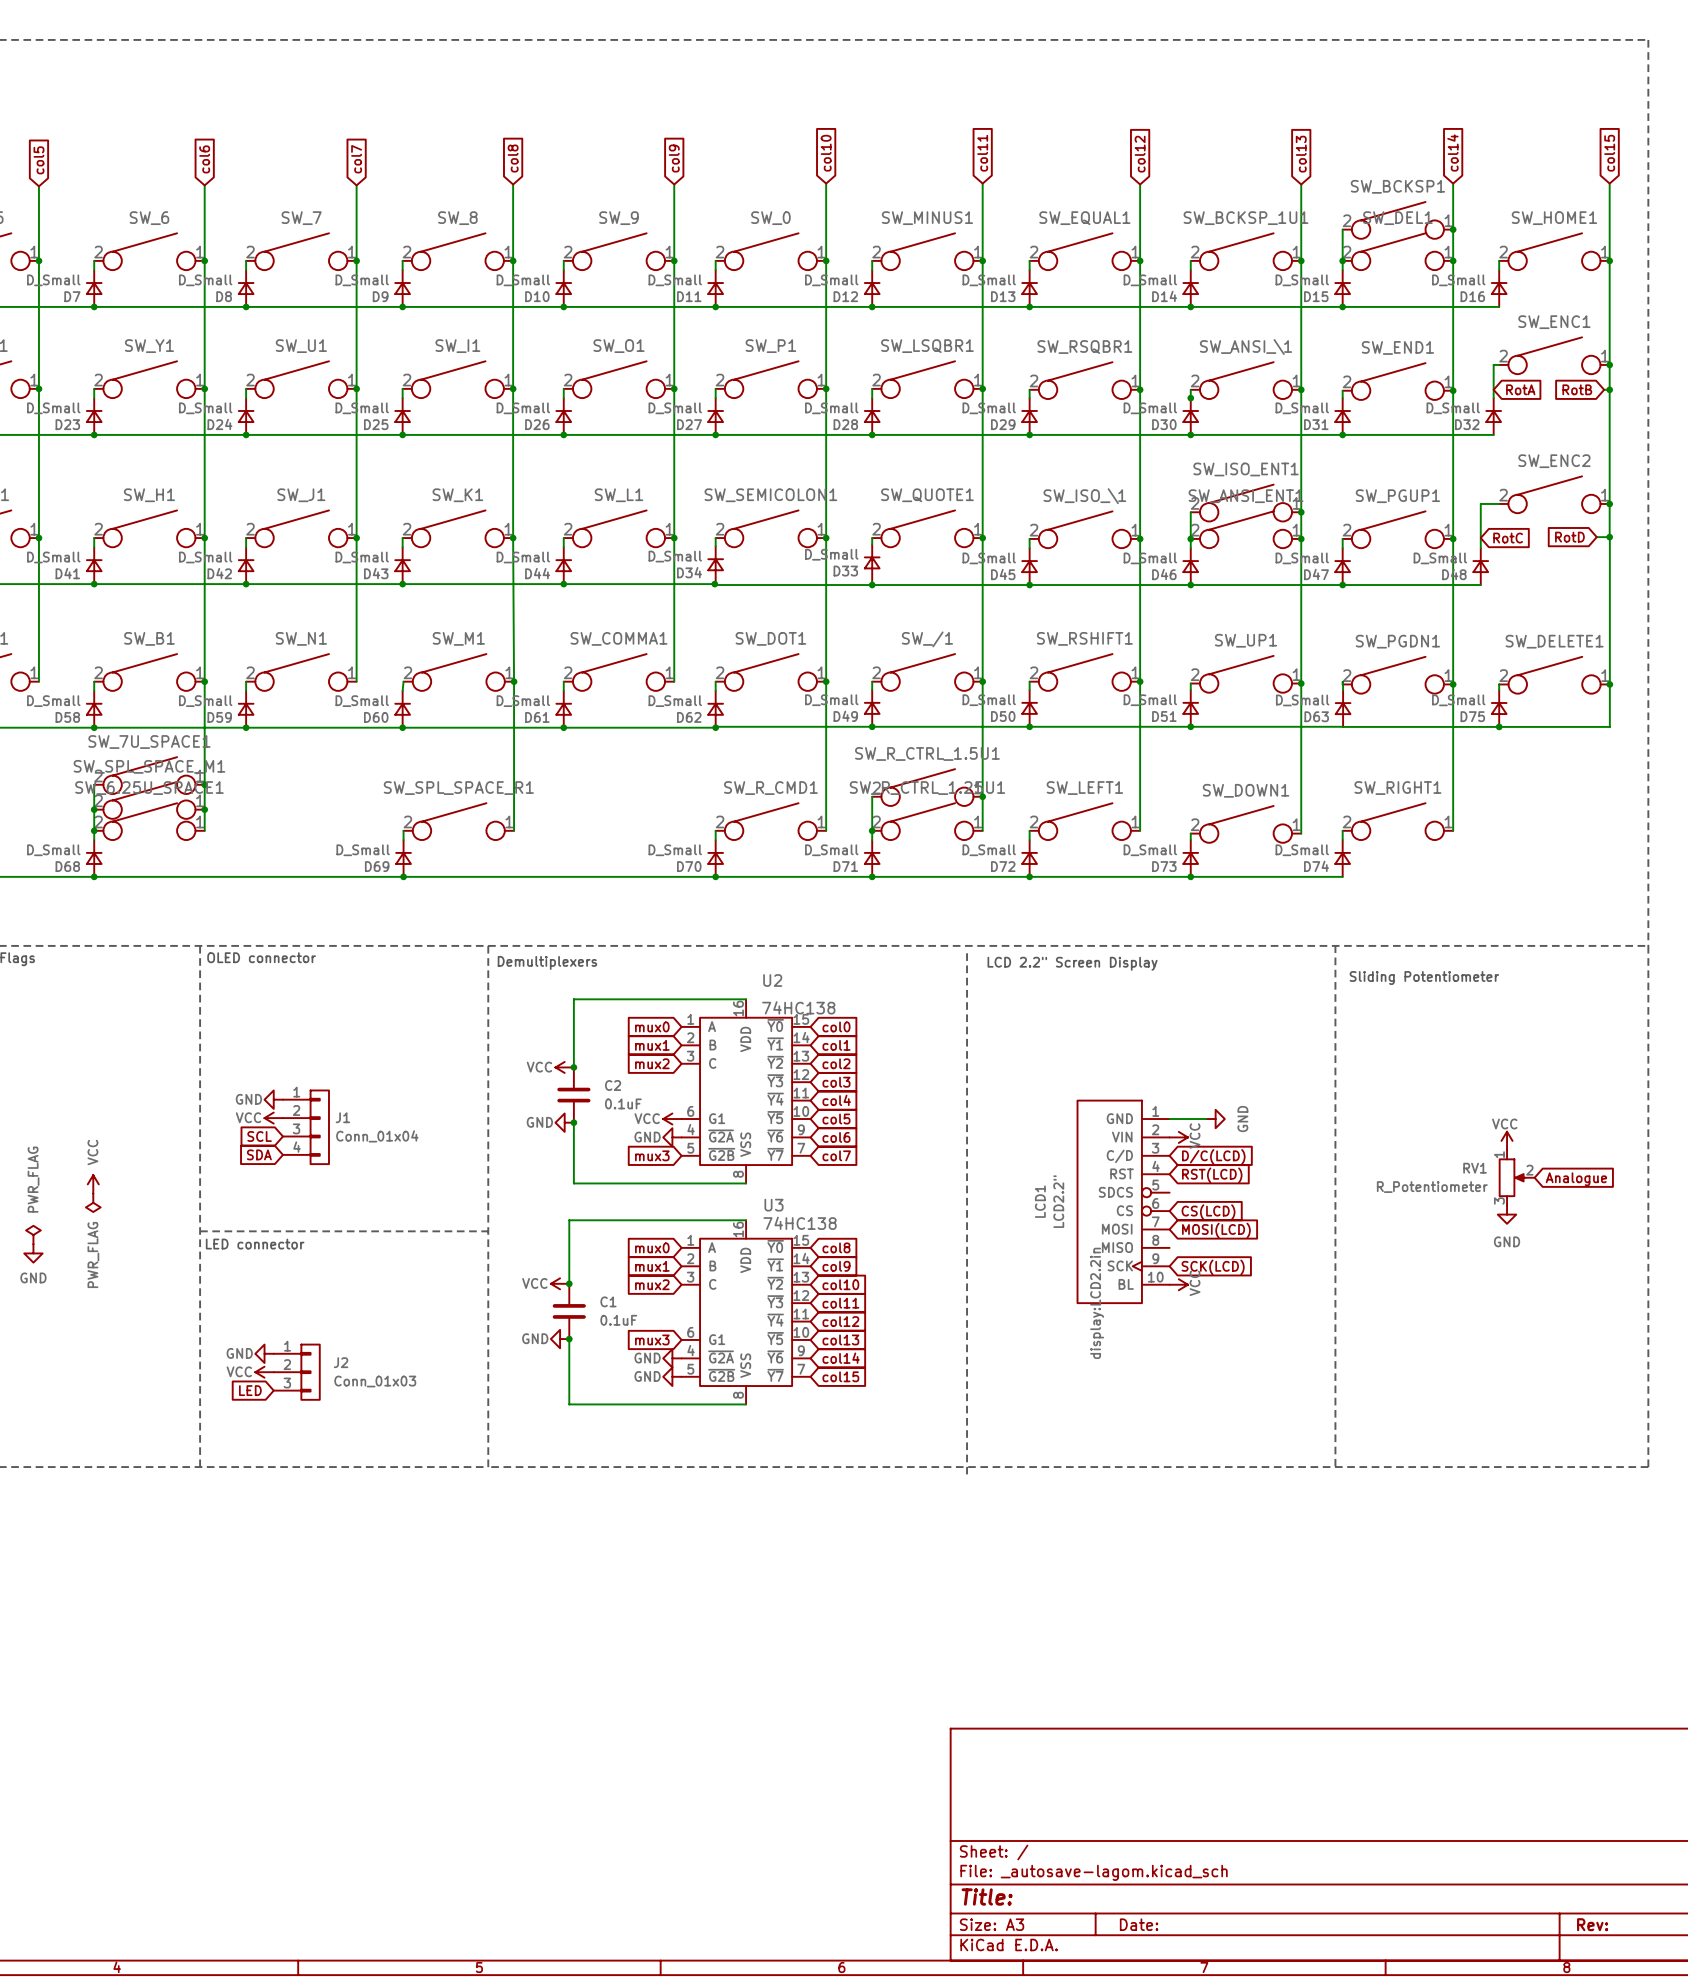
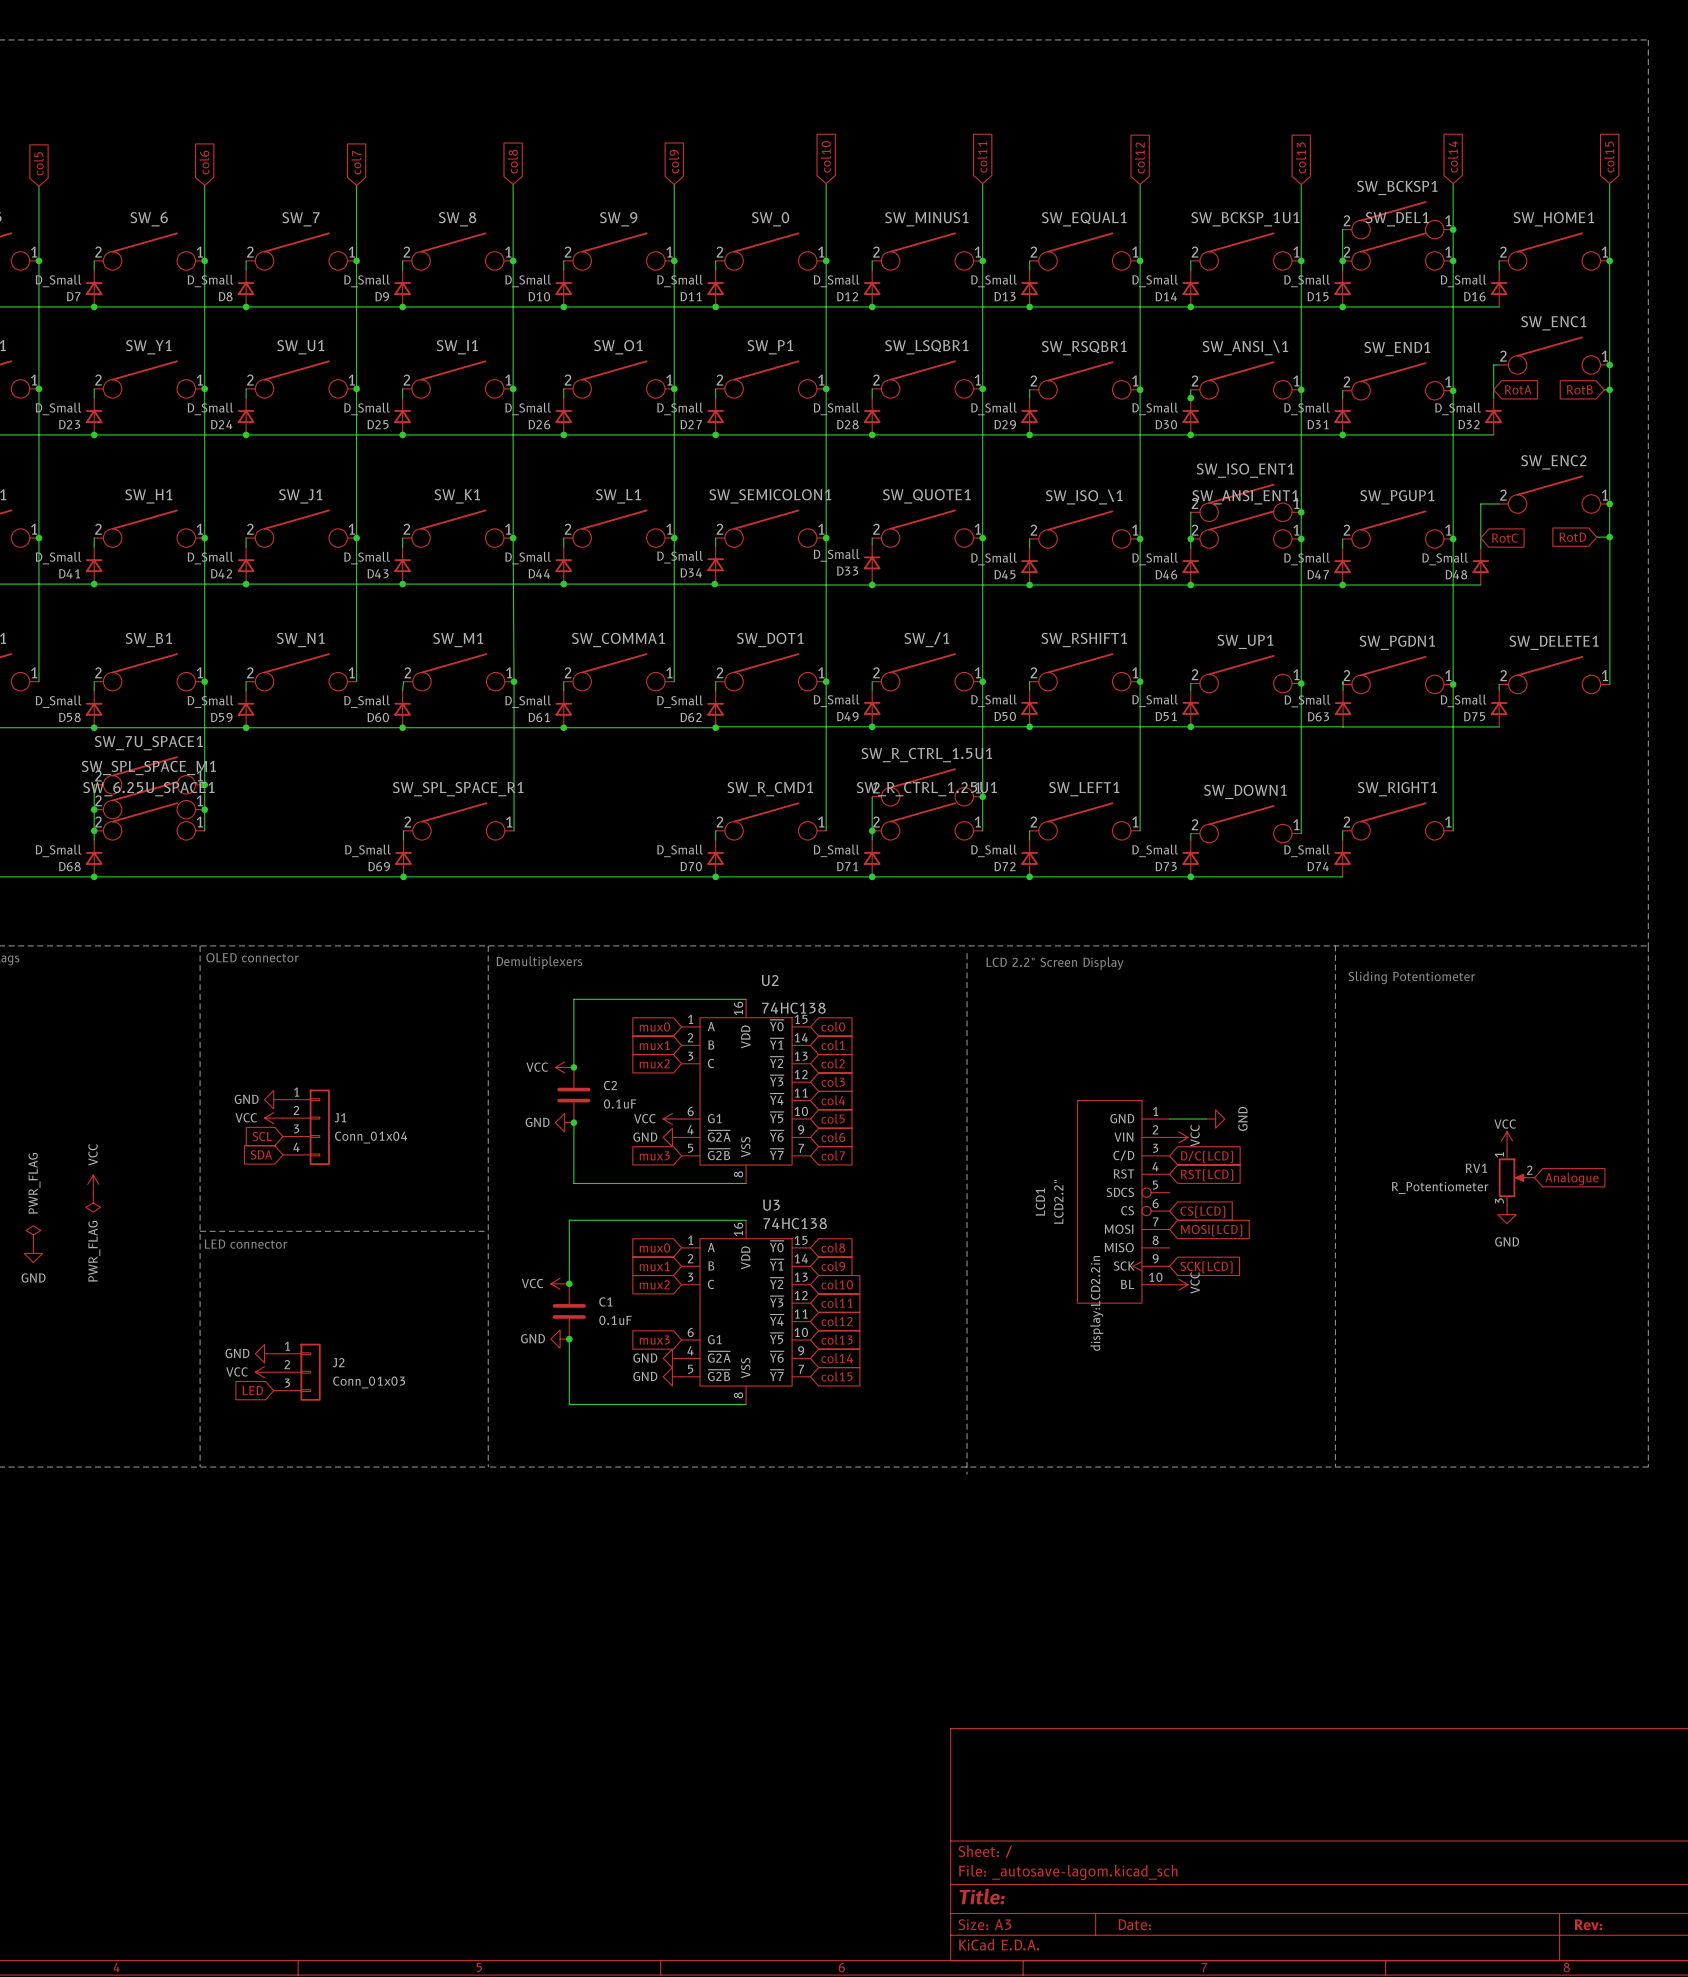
wire: (1609, 684) (1609, 726) (1499, 726) -> none
junction: (1609, 684) -> none
junction: (1499, 726) -> none

